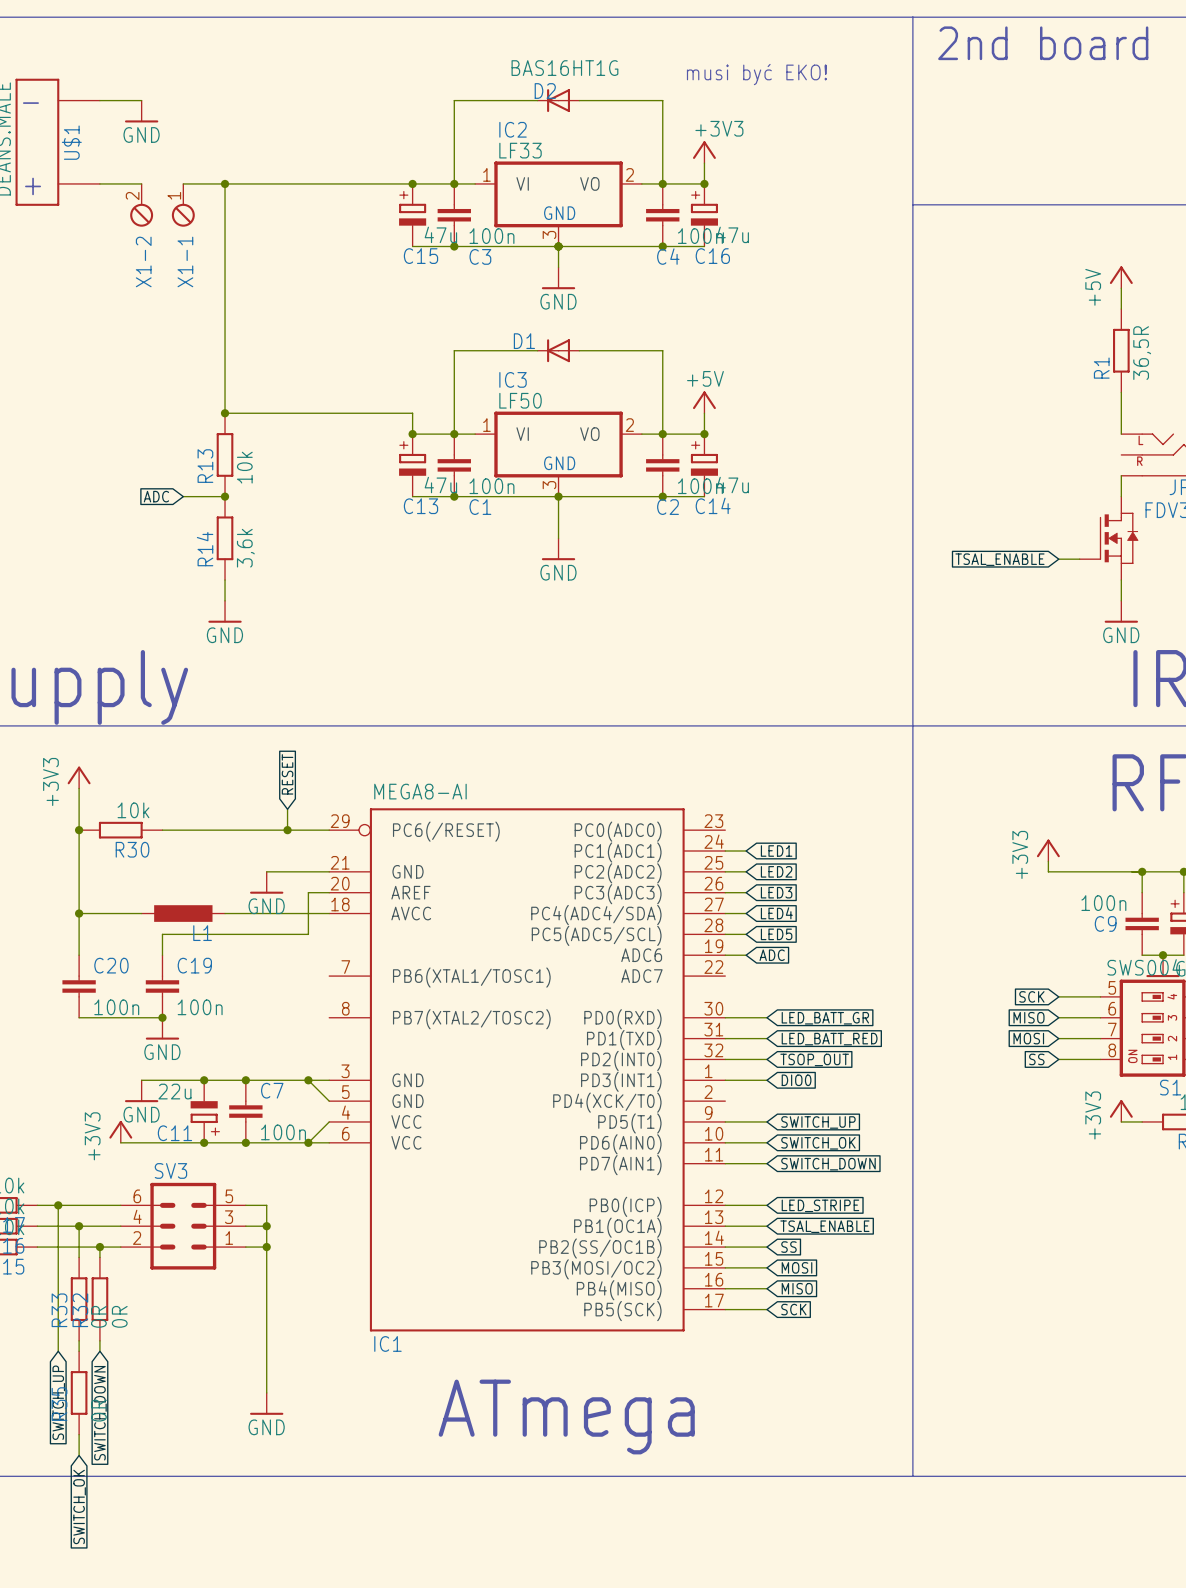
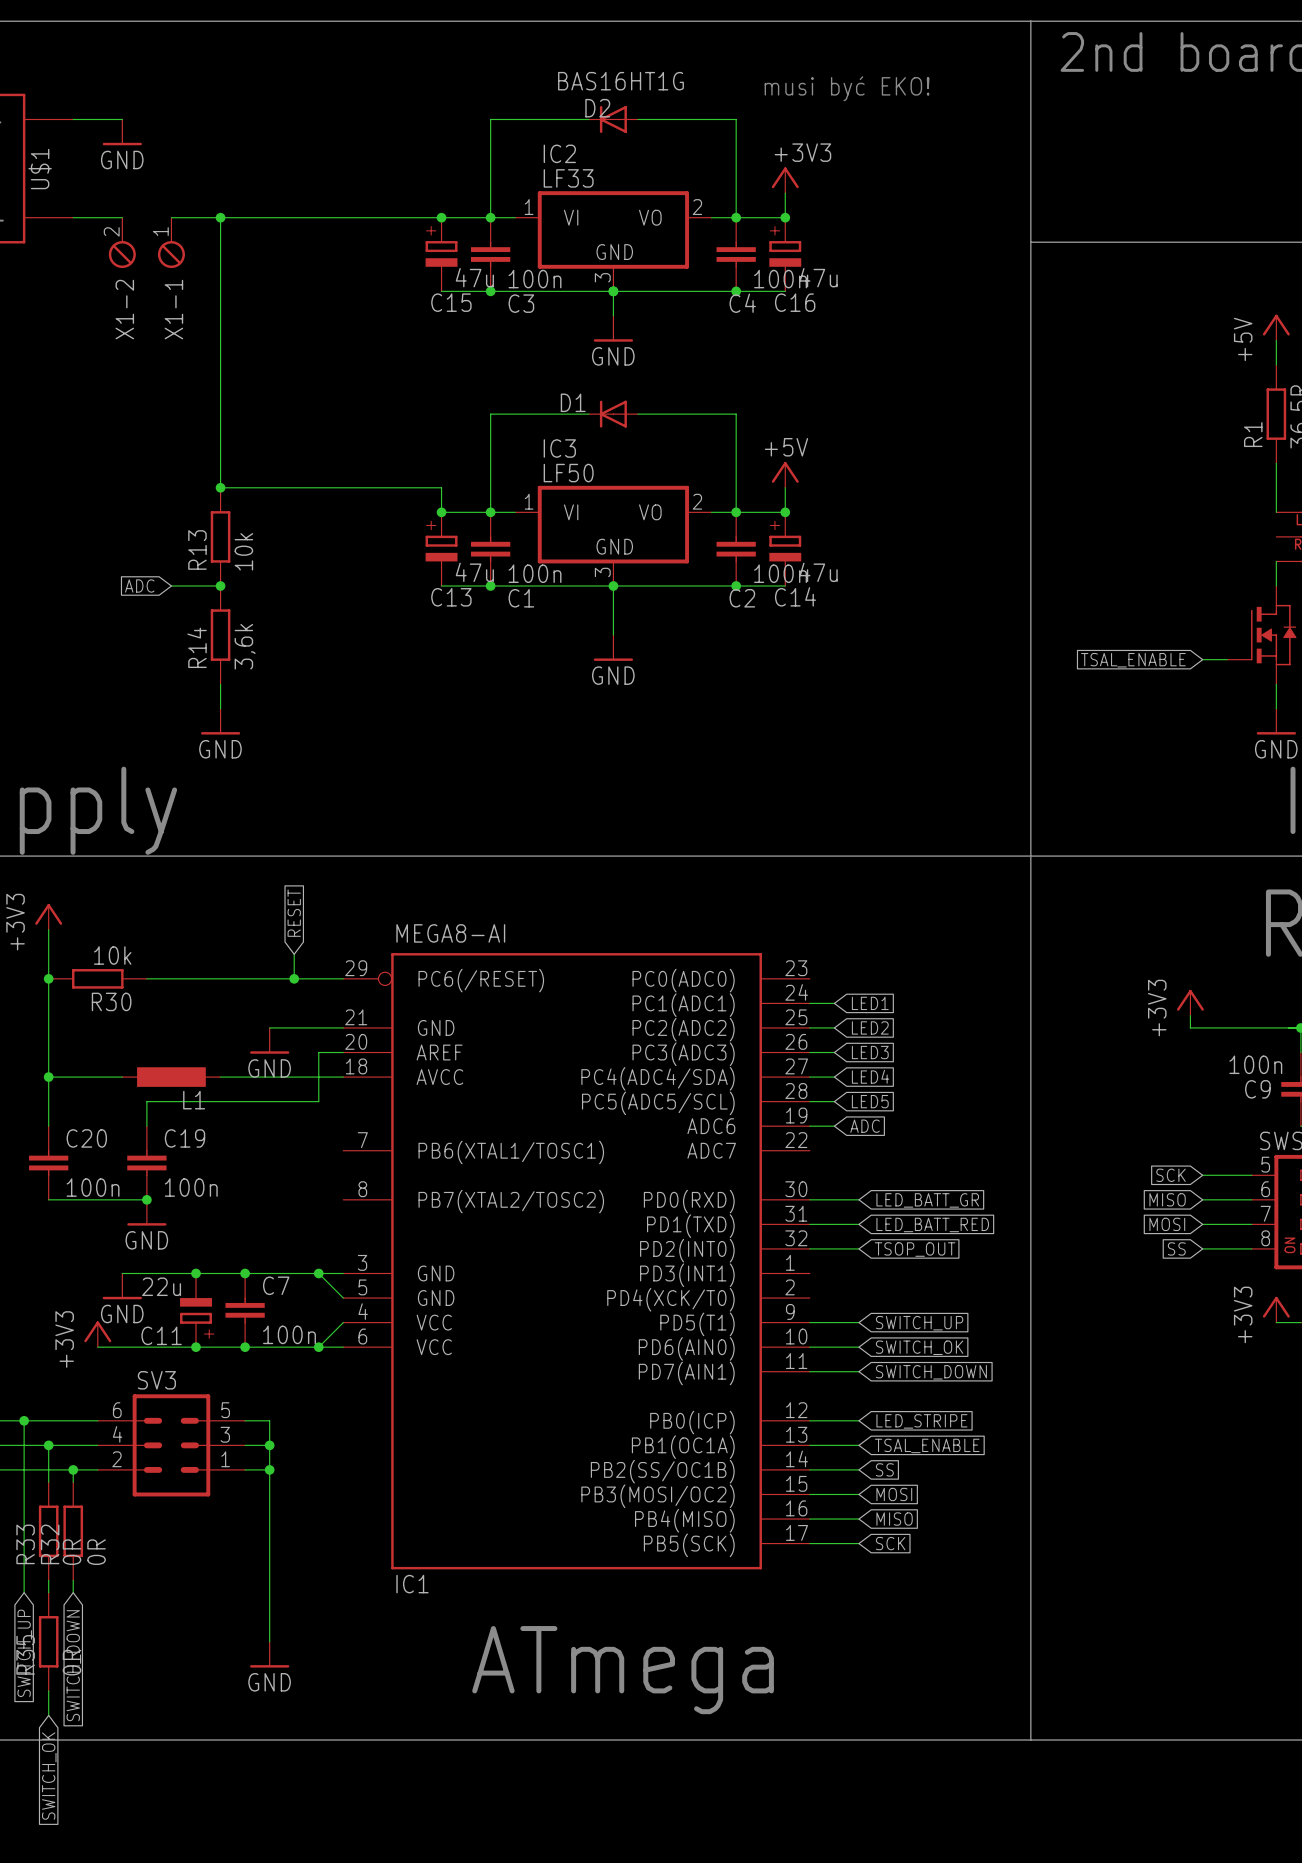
wire: (725, 1080) (766, 1080) -> none
global label: DIO0 (796, 1080) -> none

